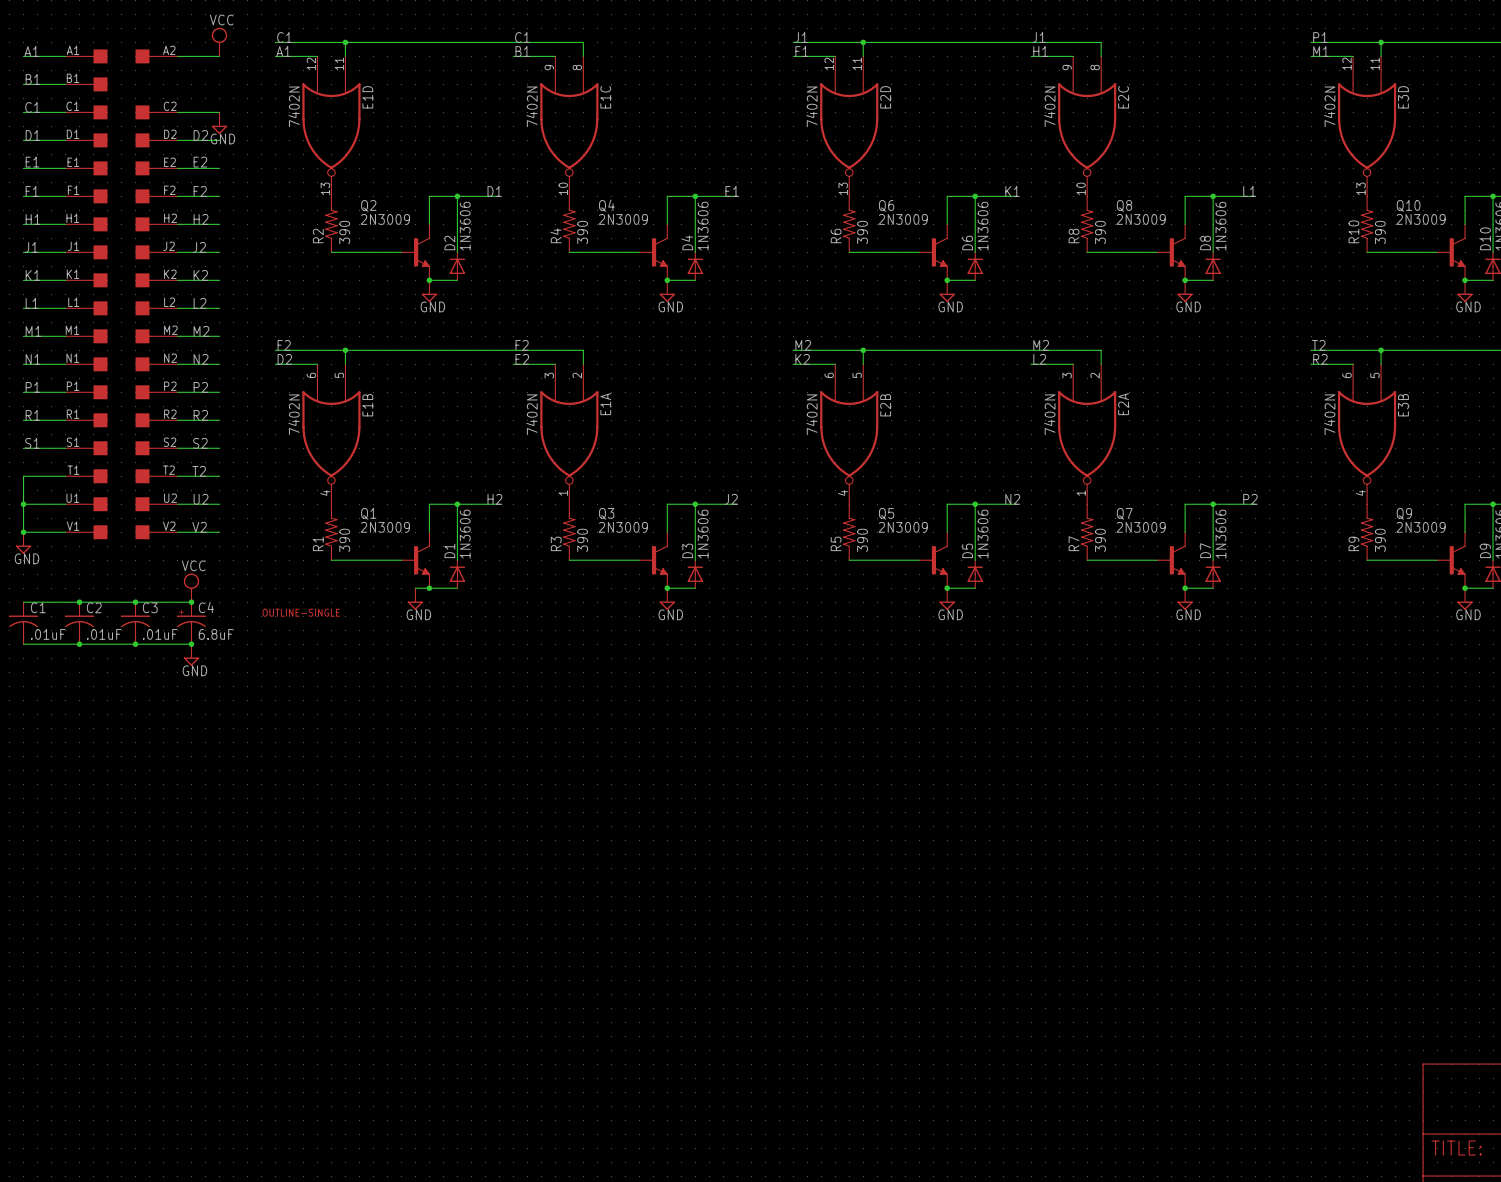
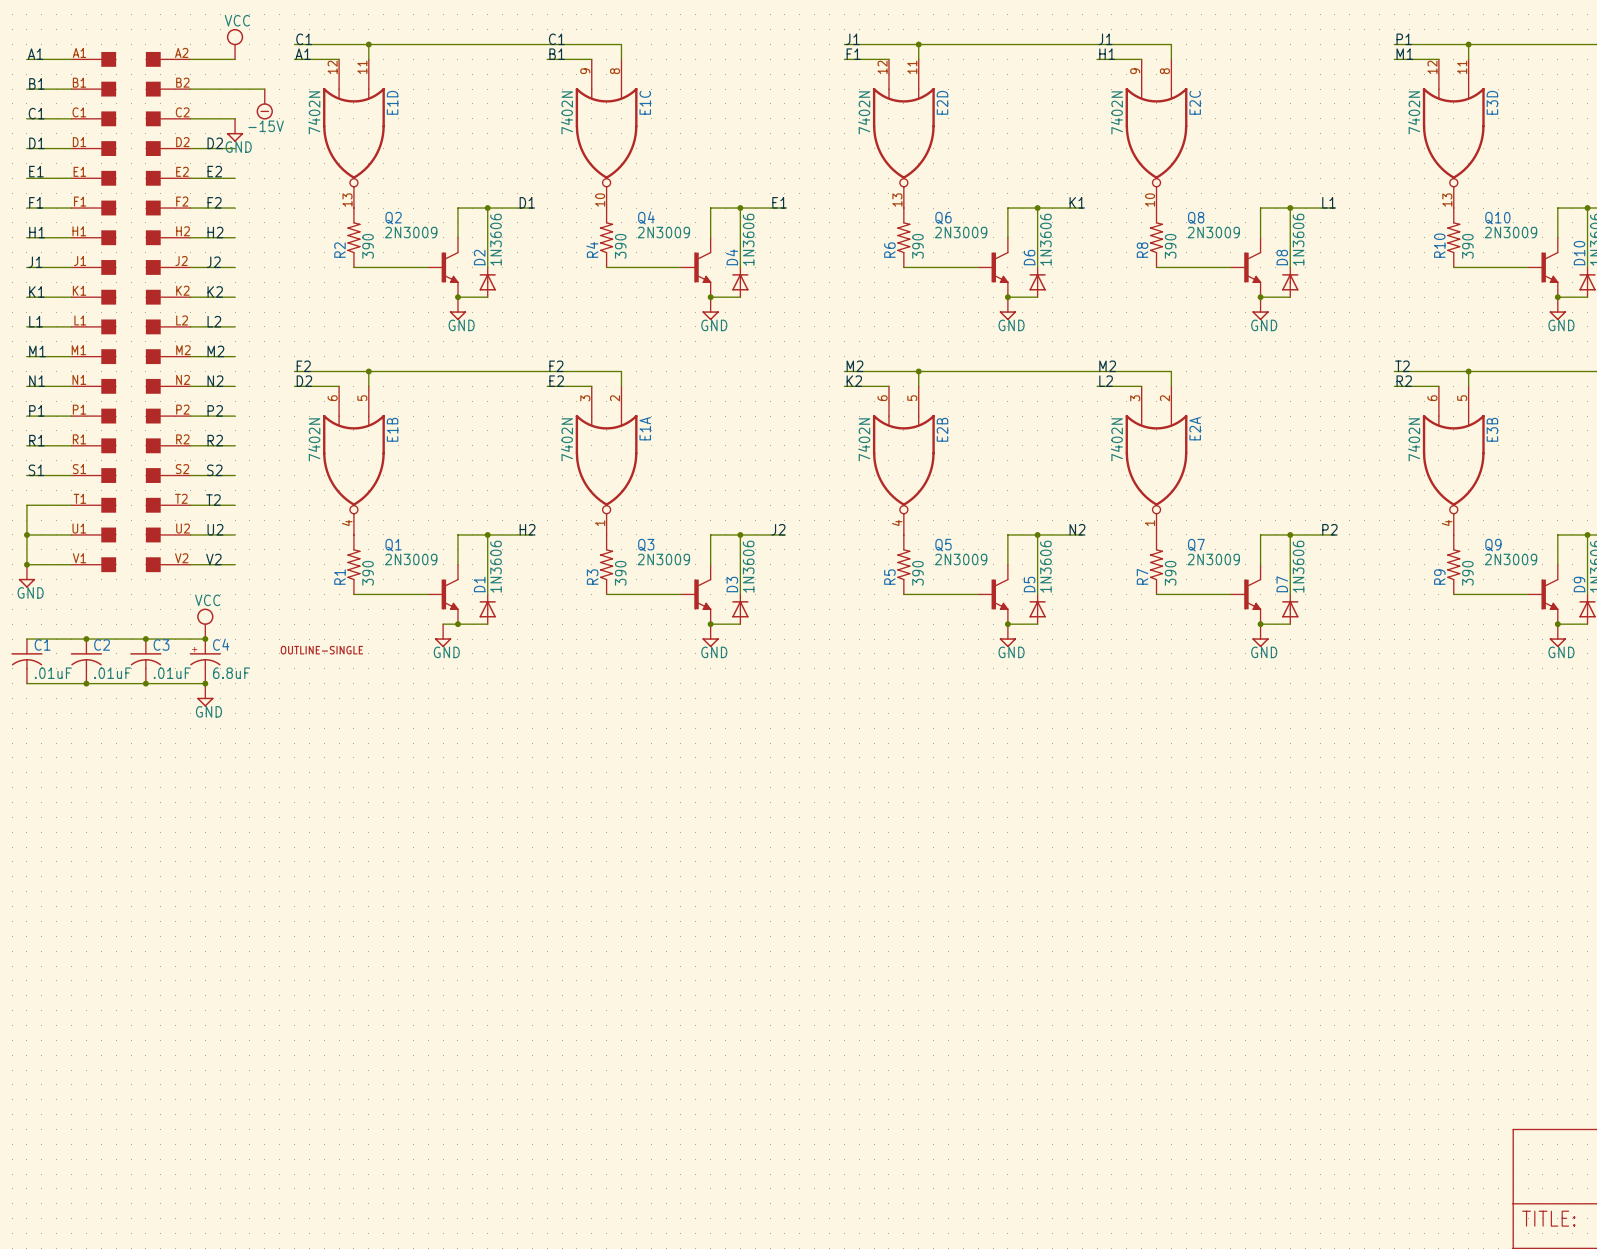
part: none -> (168, 89)
wire: none -> (190, 89) (264, 89)
power symbol: none -> -15V (264, 104)

